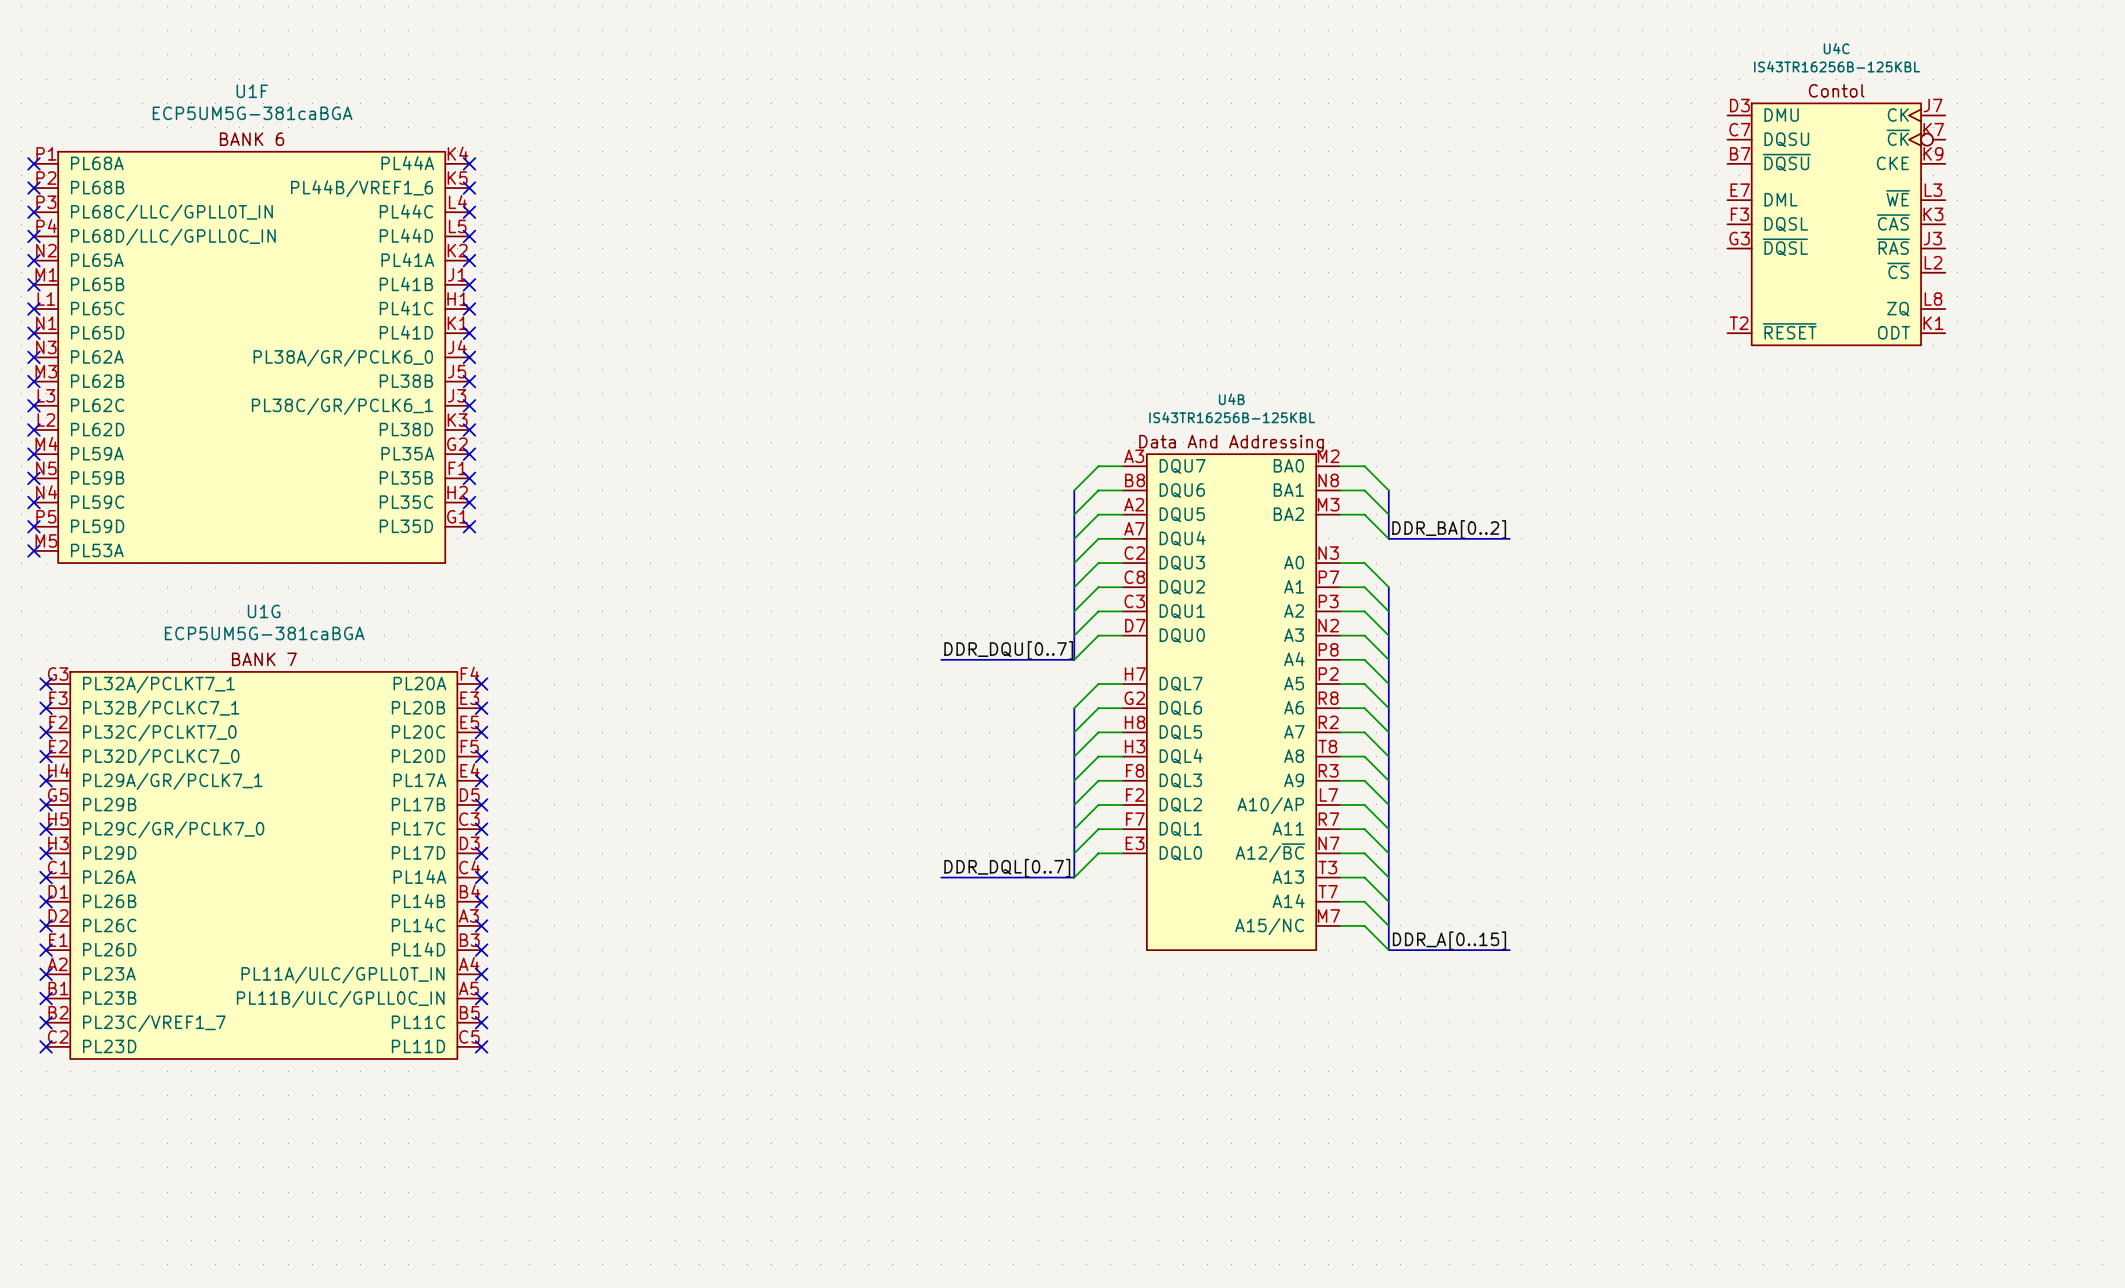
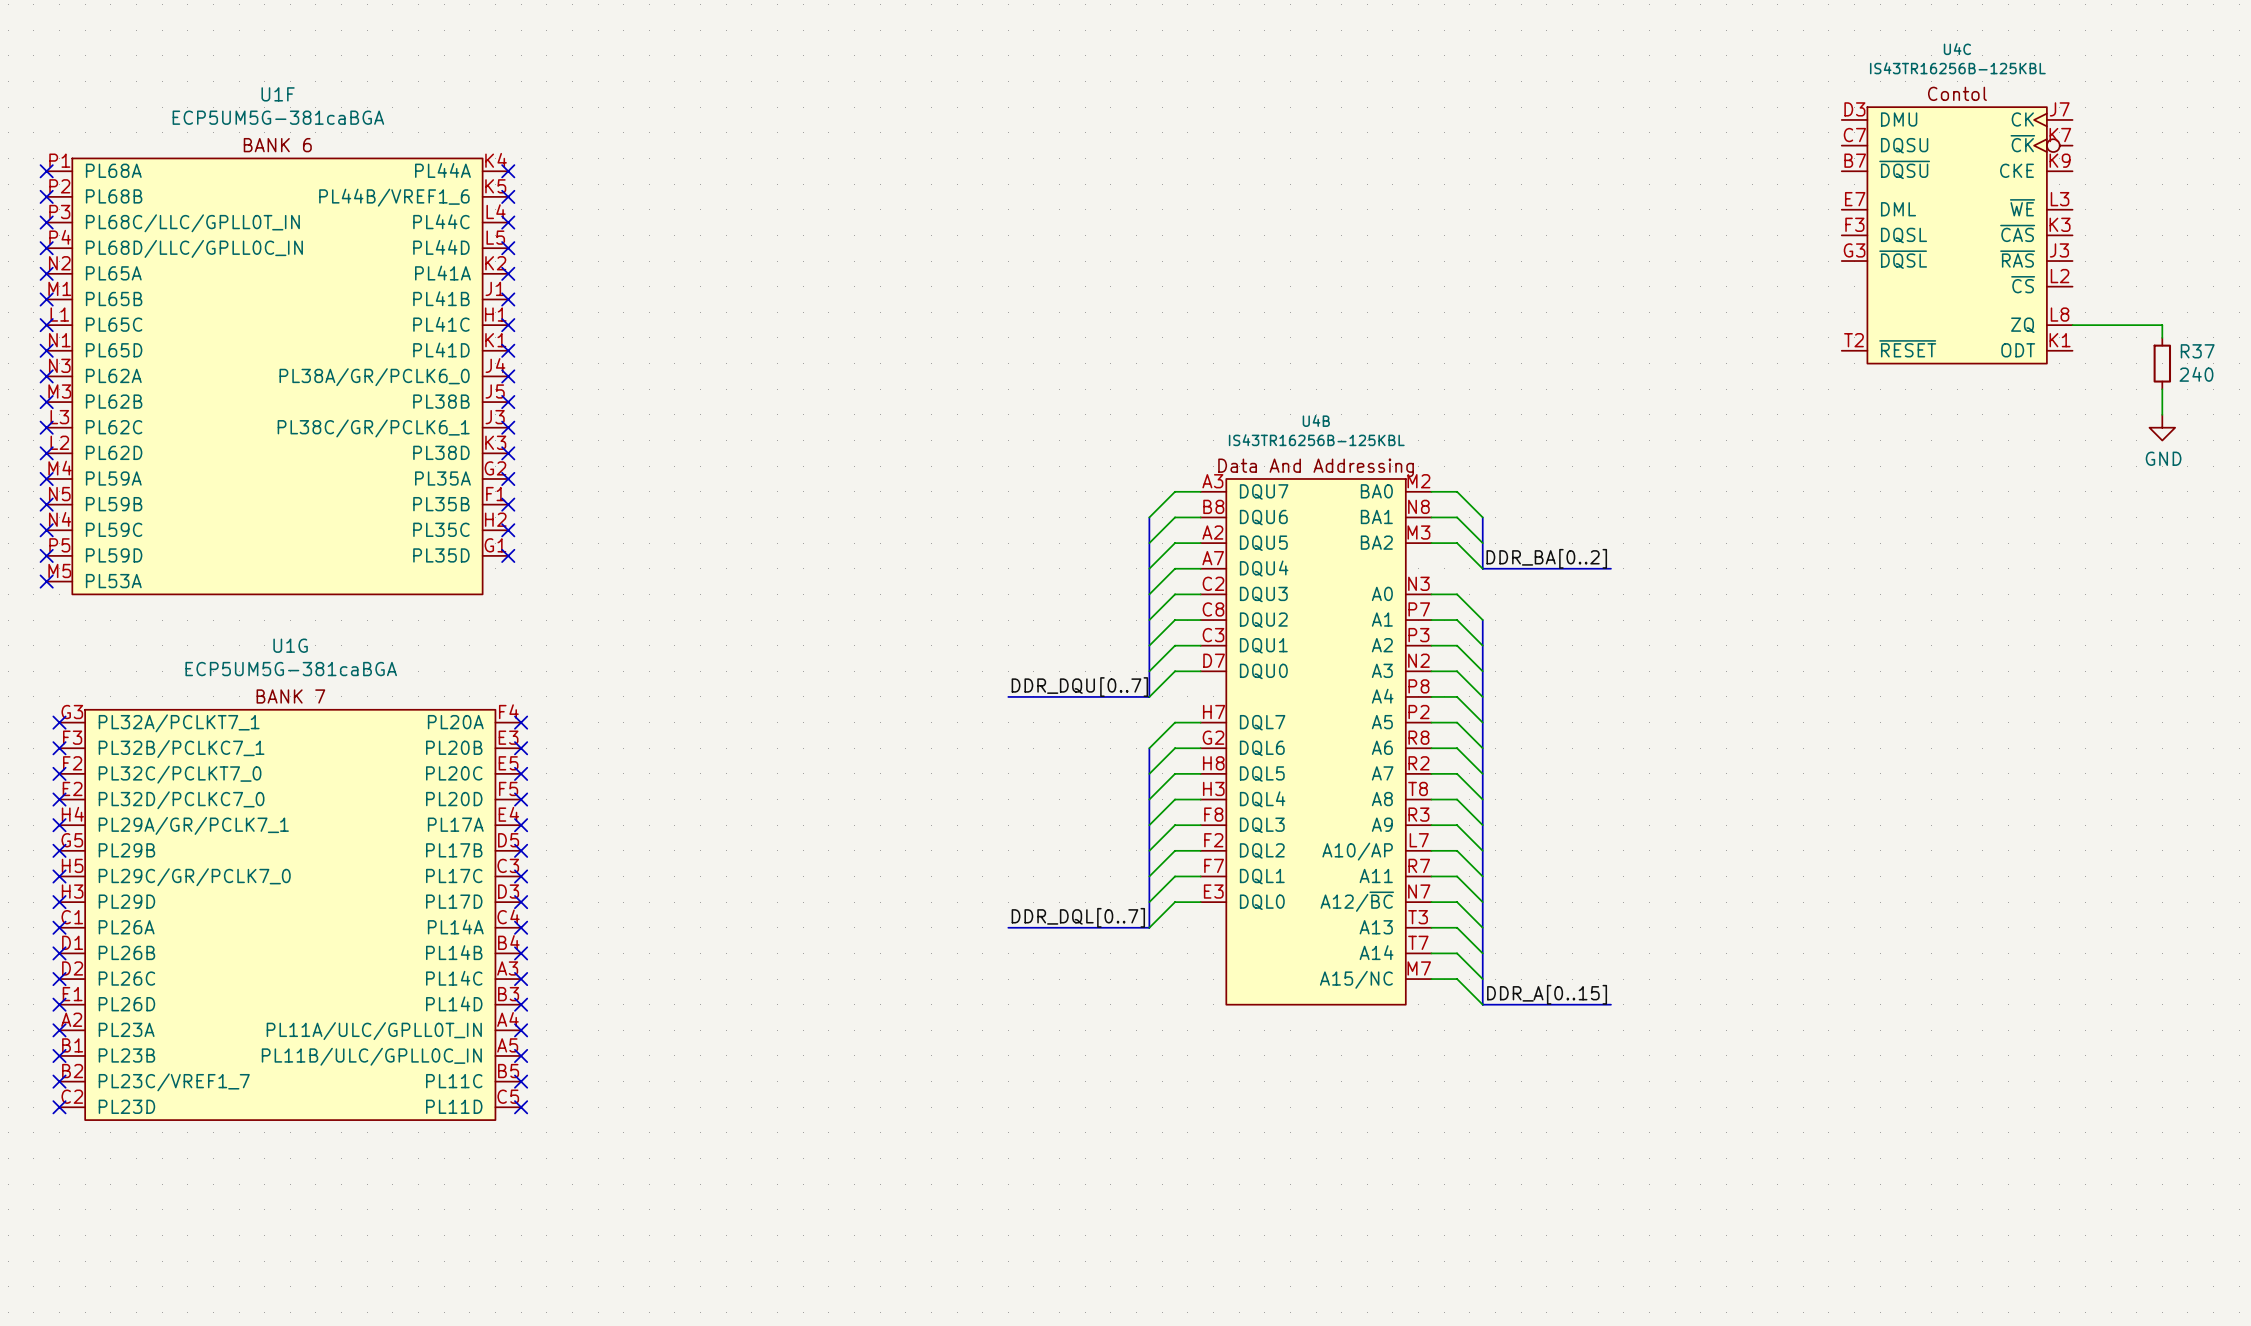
wire: none -> (2072, 325) (2162, 325) (2162, 337)
R37: none -> 240 (2162, 363)
wire: none -> (2162, 389) (2162, 414)
power symbol: none -> GND (2162, 427)

